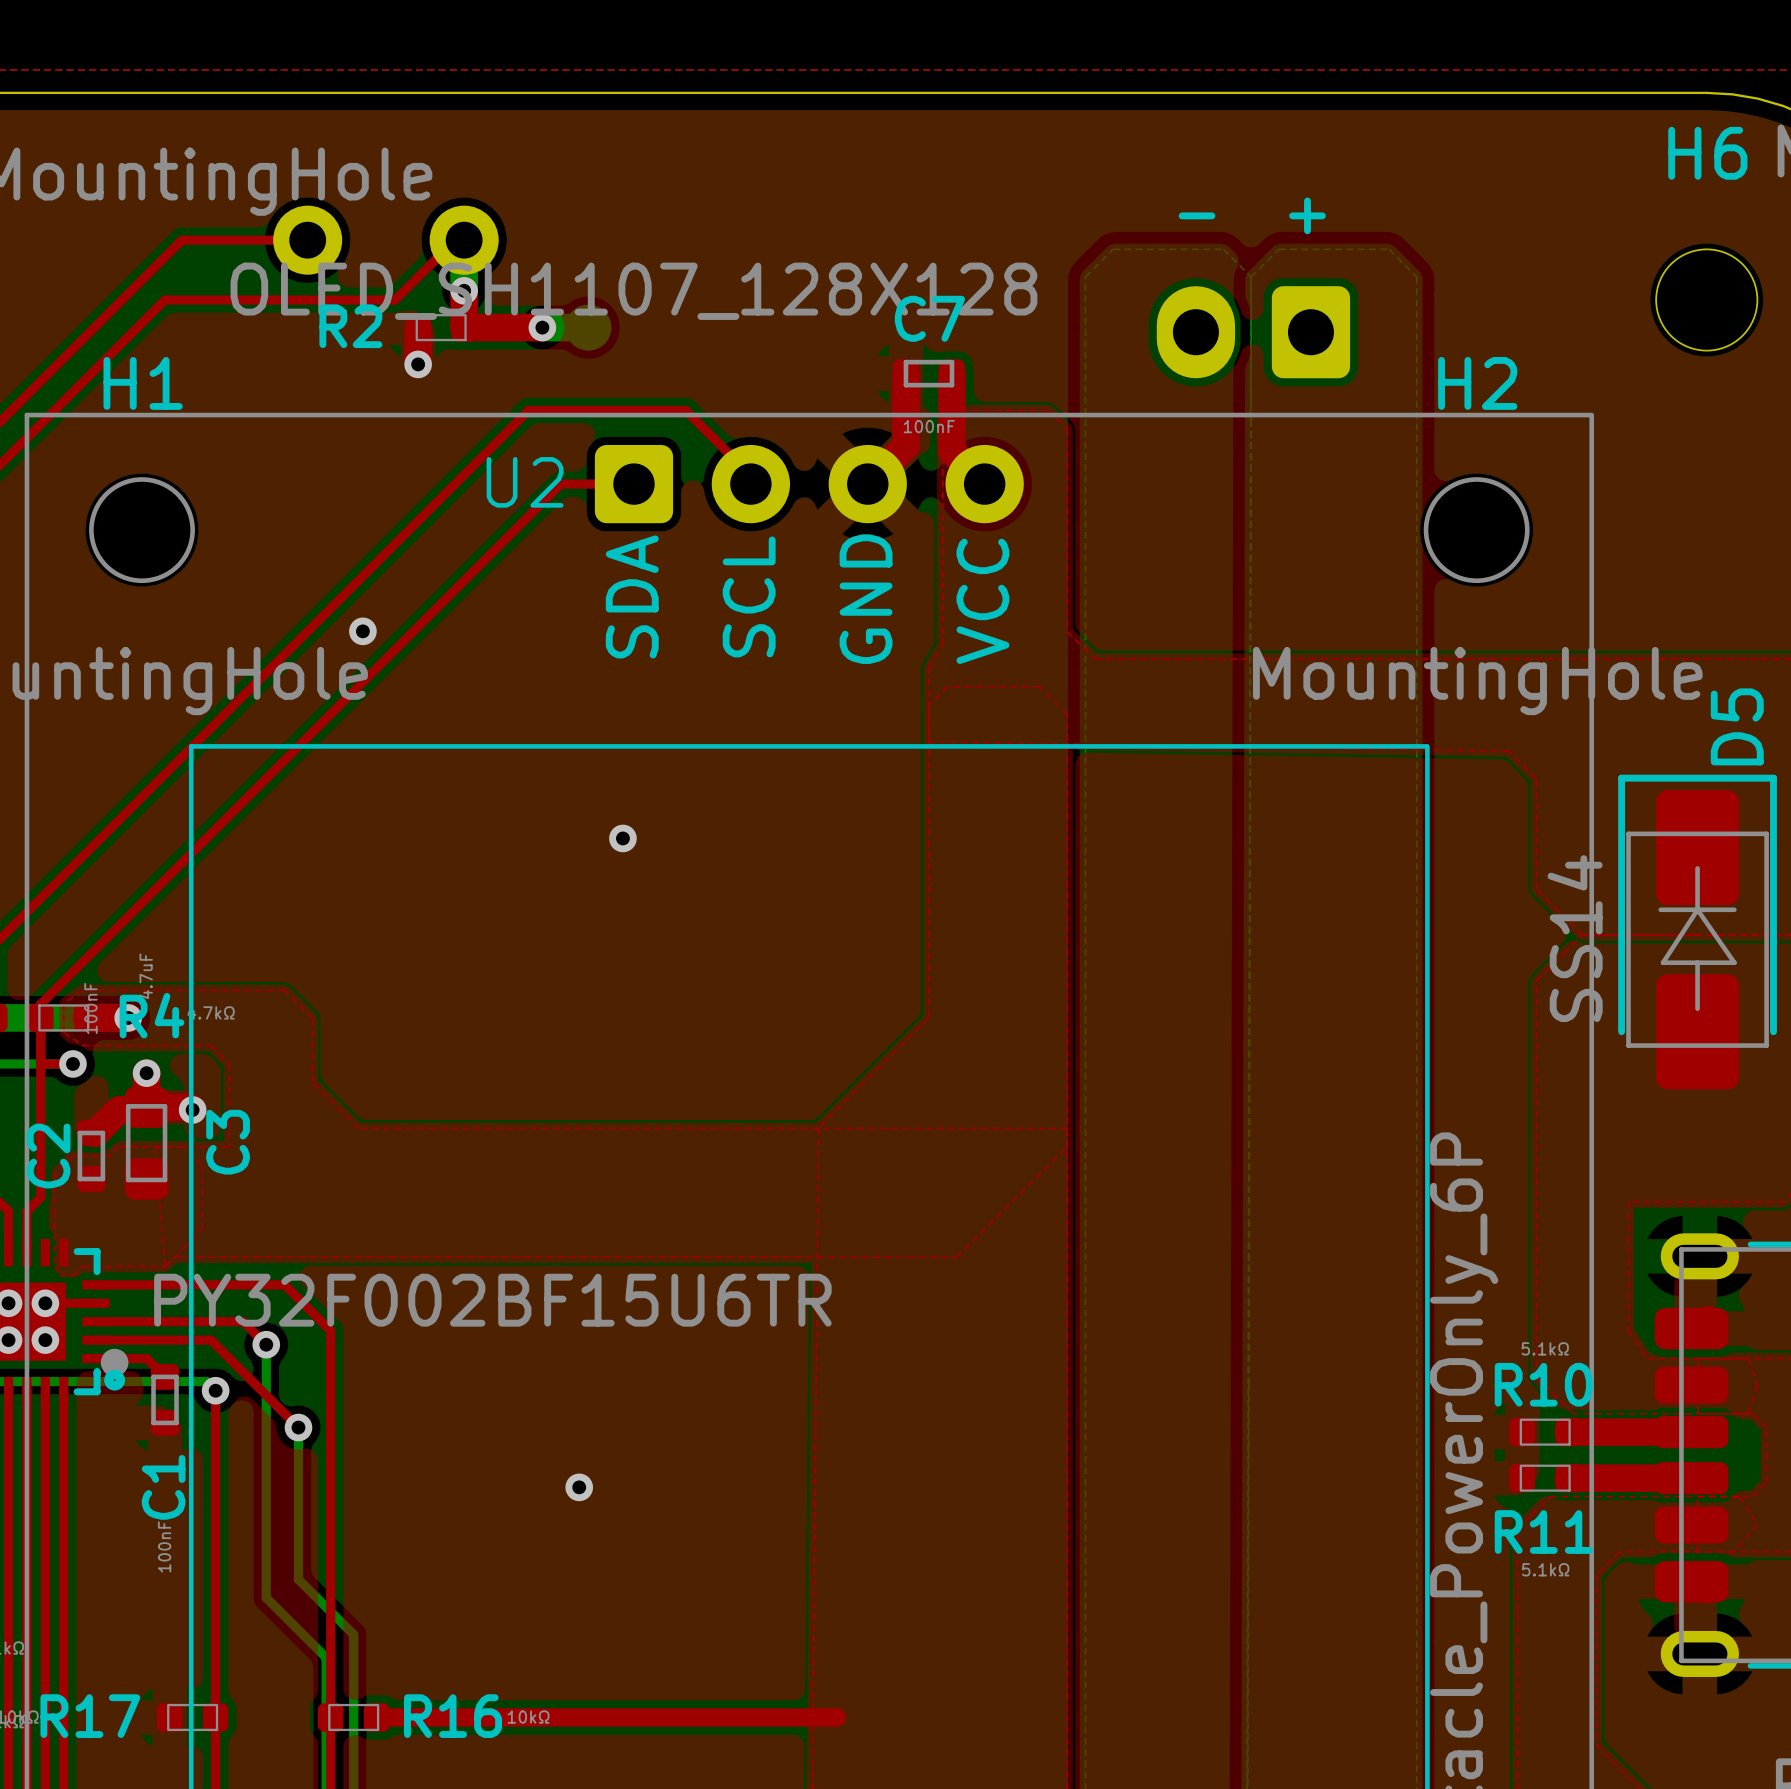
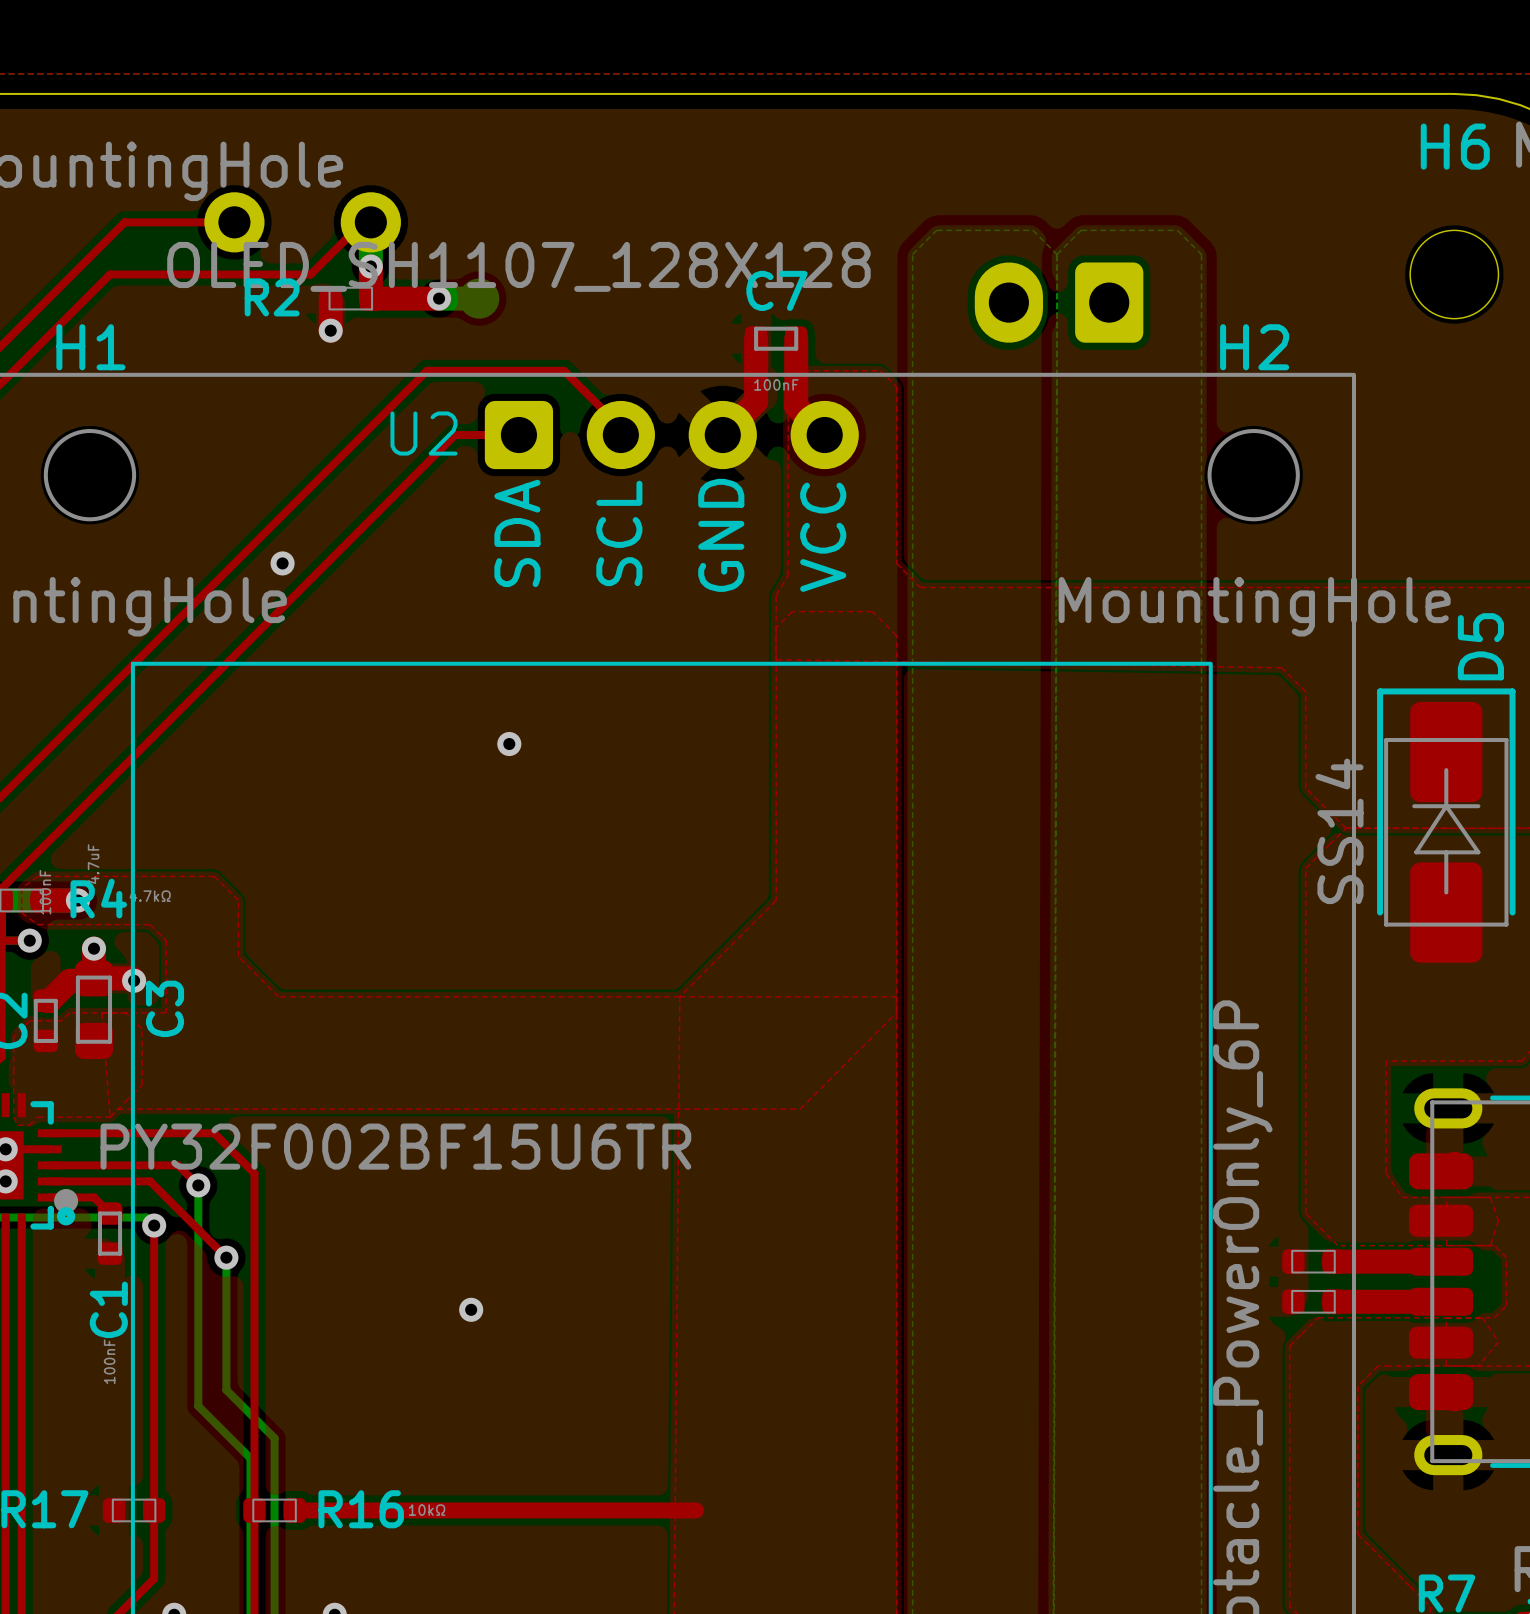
text: - (1197, 215) -> none
text: + (1307, 215) -> none
R10 value: 5.1kΩ (1545, 1348) -> none
R10 name: R10 (1543, 1384) -> none
R11 name: R11 (1543, 1532) -> none
R11 value: 5.1kΩ (1545, 1569) -> none

